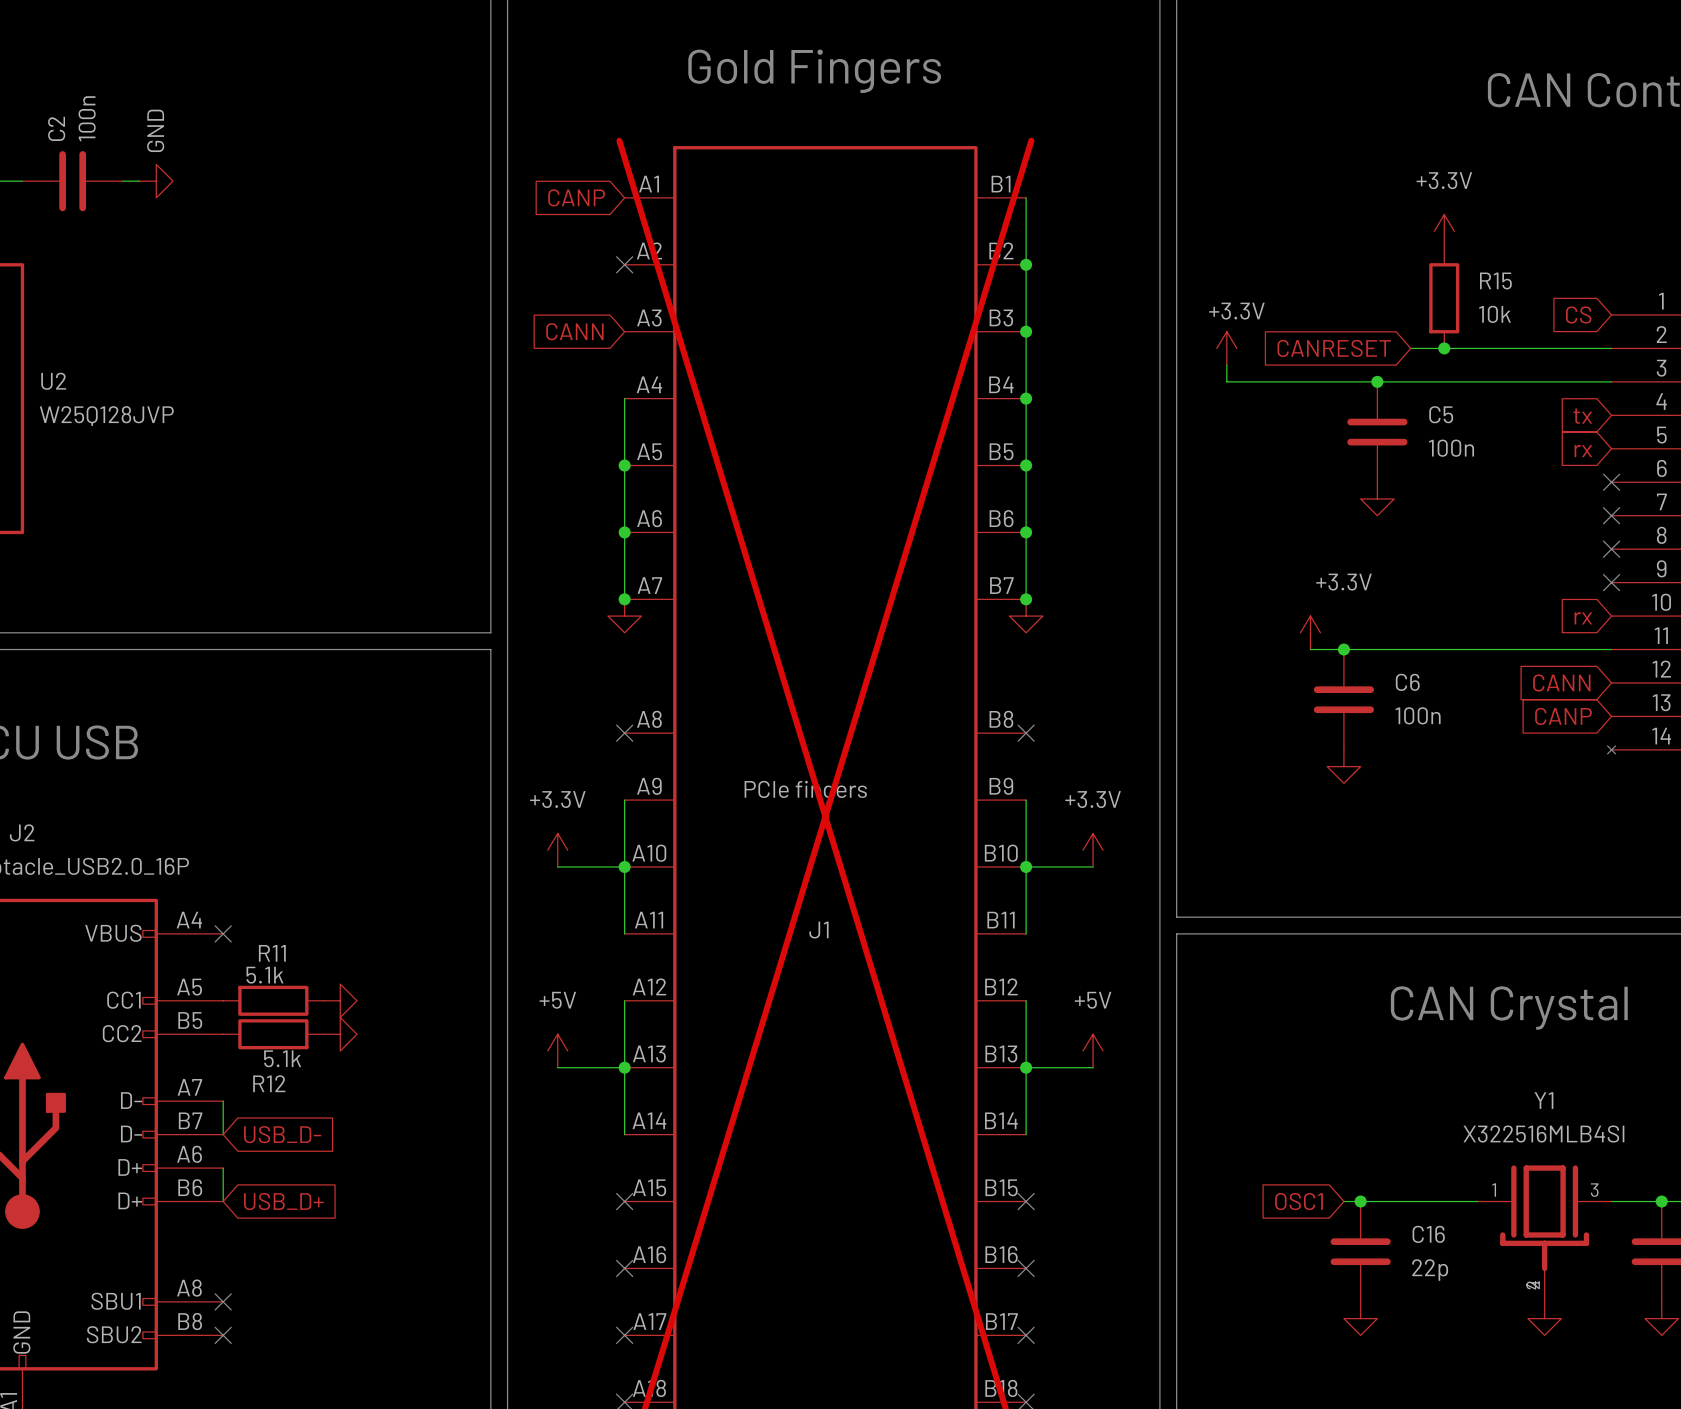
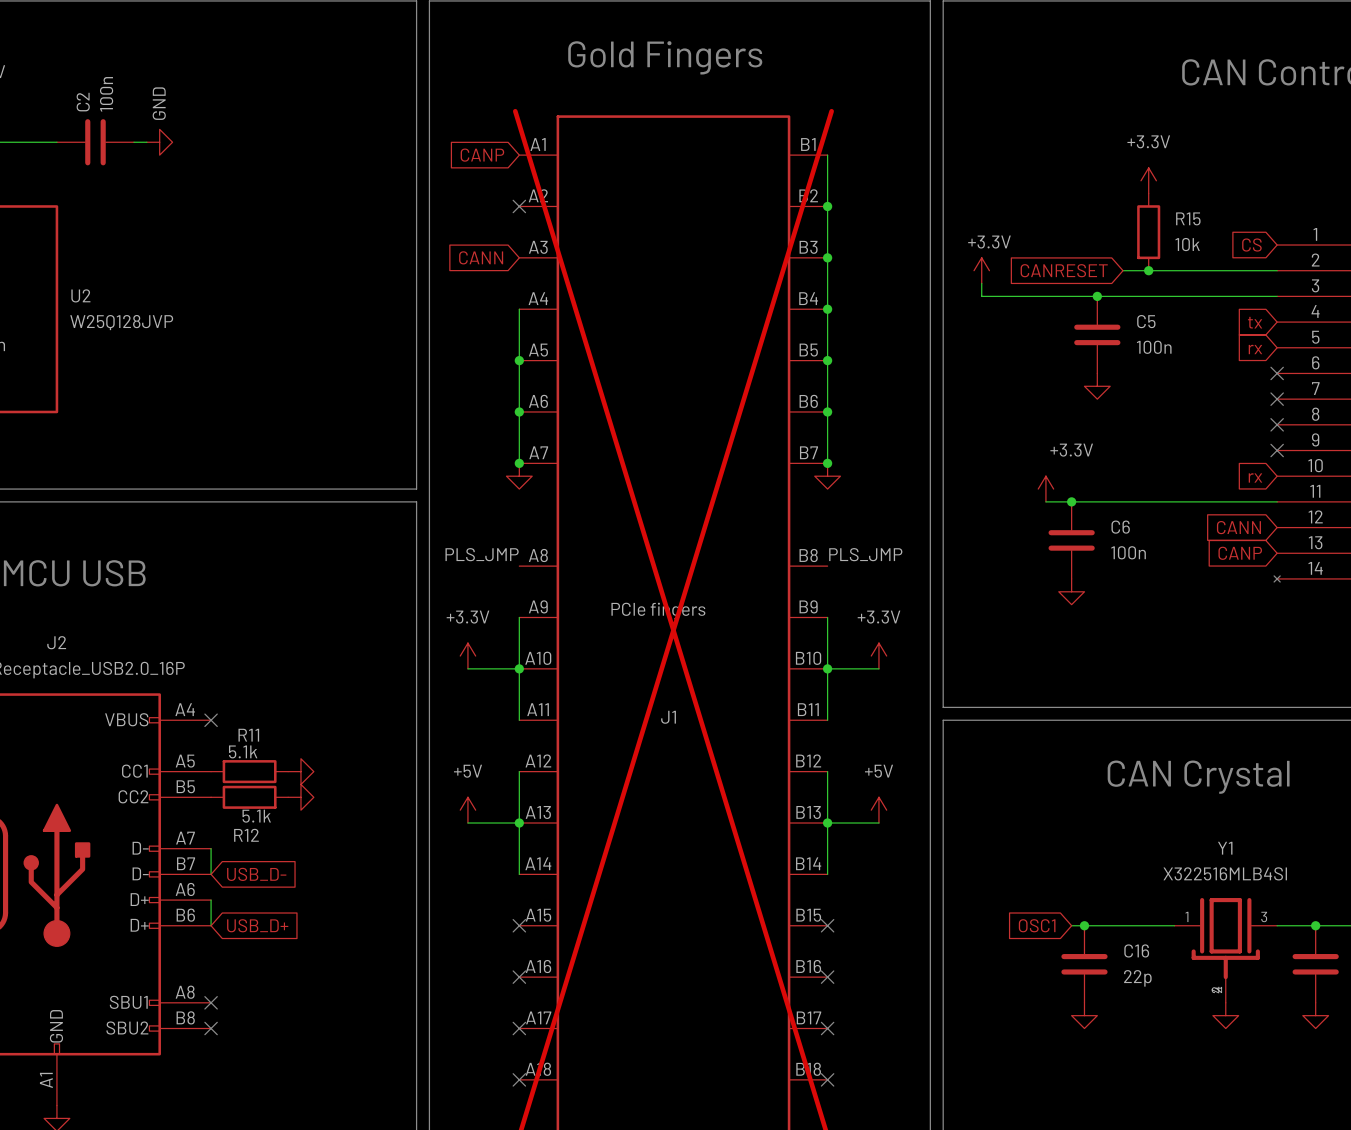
label: none -> PLS_JMP (482, 554)
label: none -> PLS_JMP (865, 554)
no-connect mark: (624, 733) -> none
no-connect mark: (1026, 733) -> none

